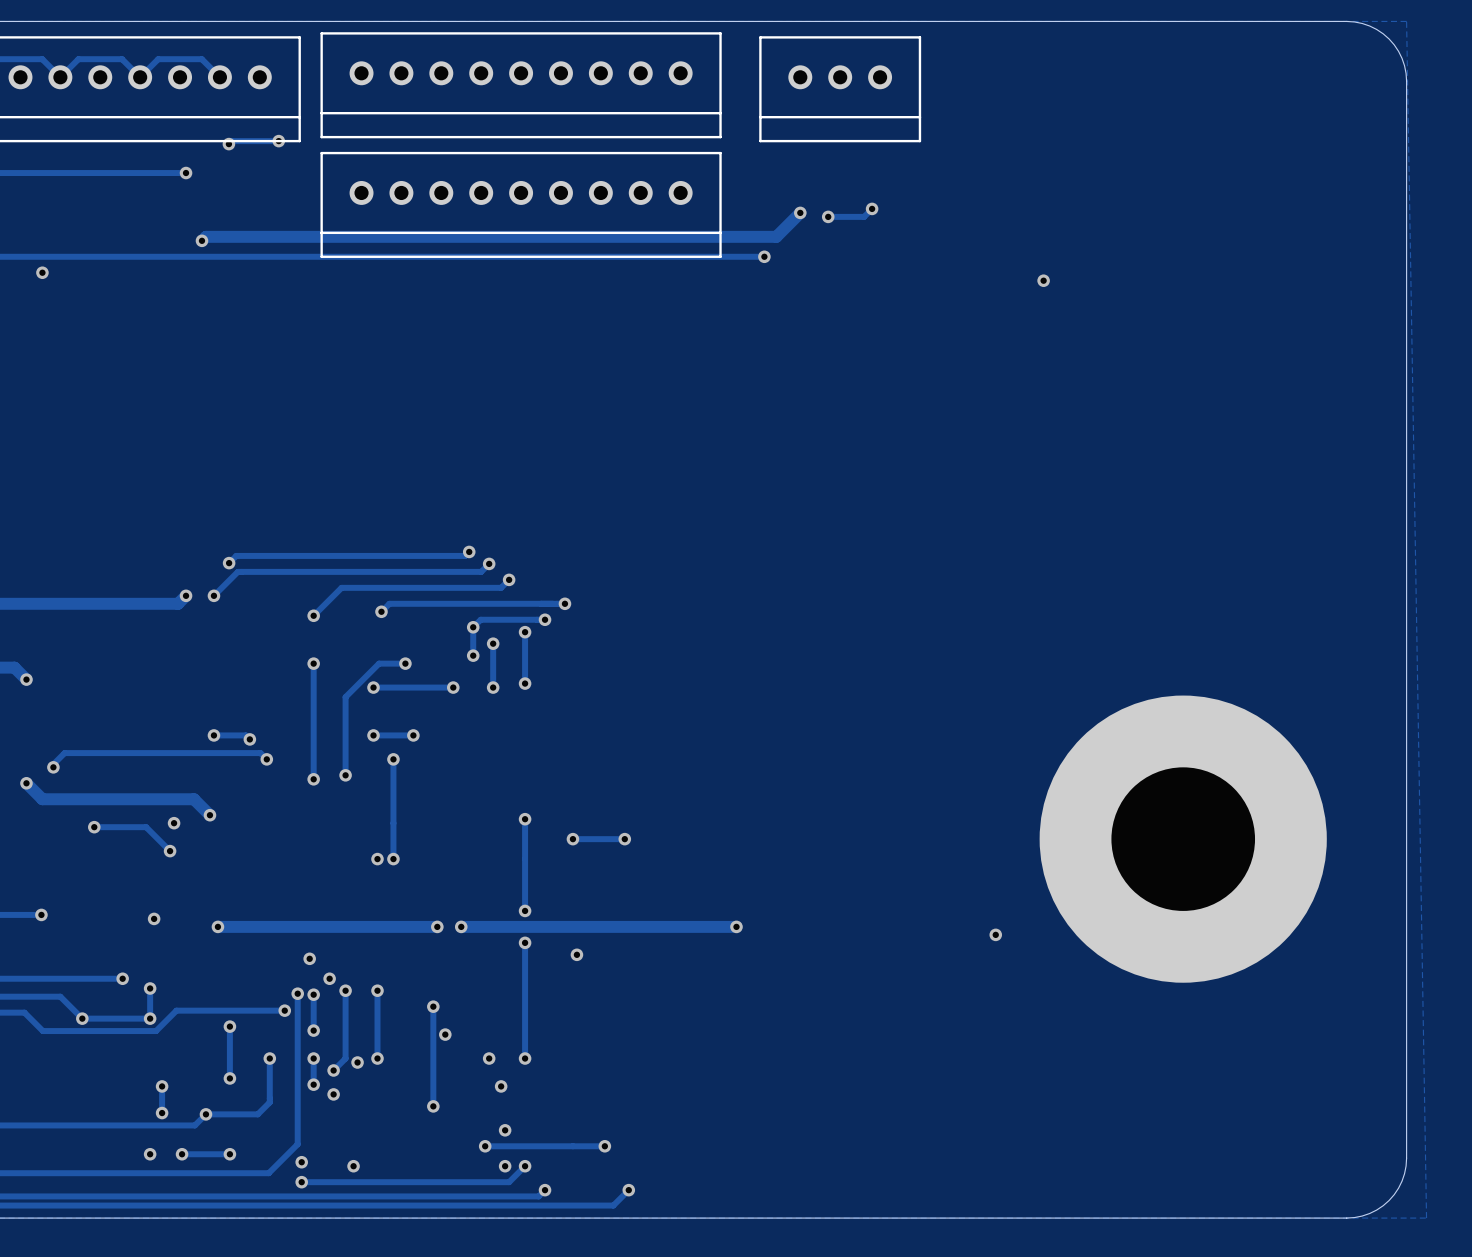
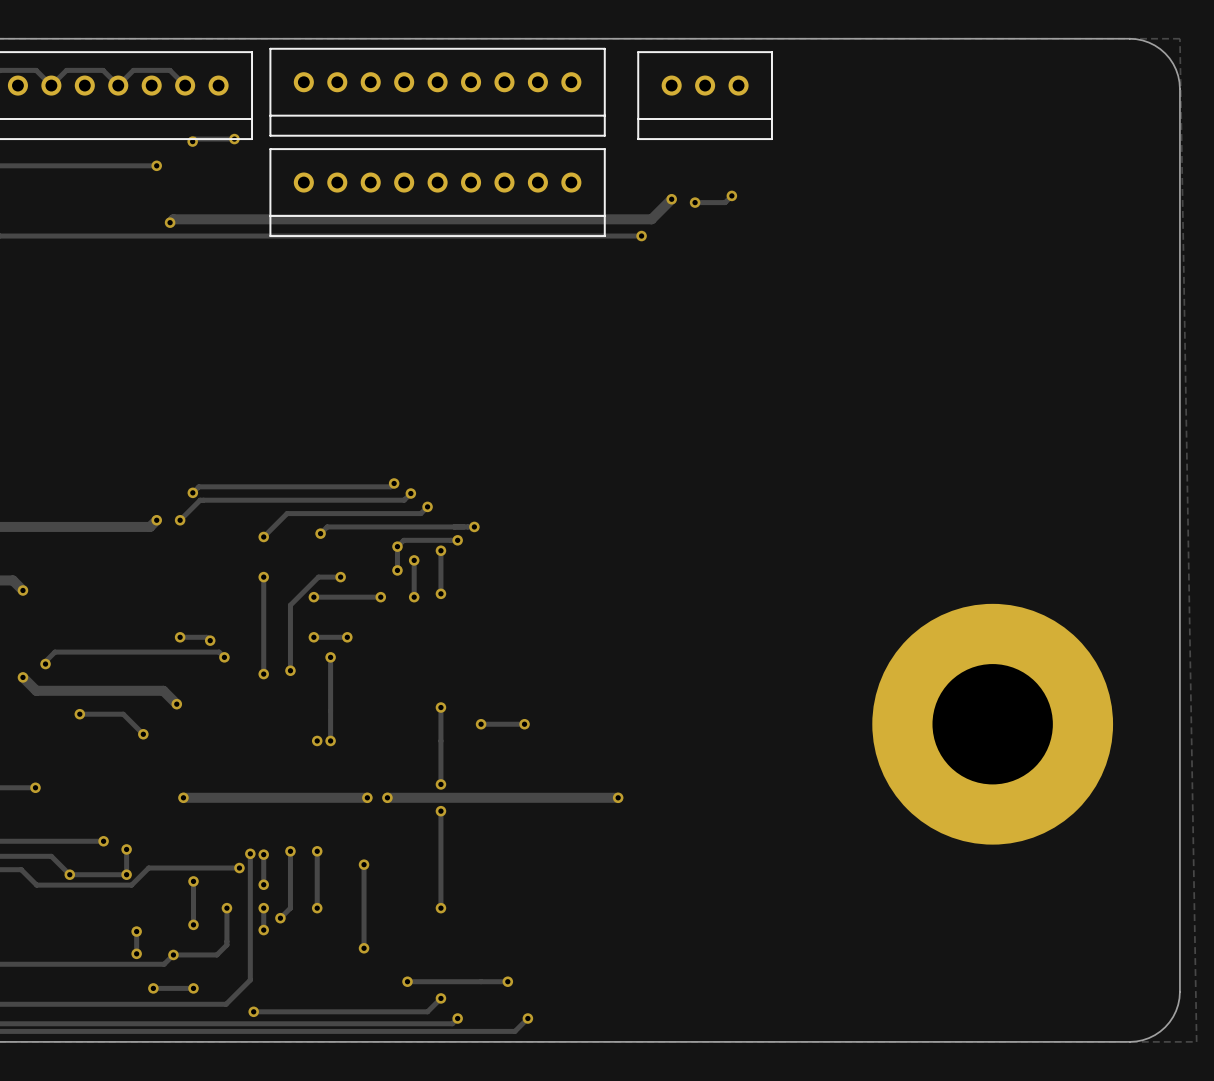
via: (42, 272) -> none
via: (1043, 280) -> none
via: (174, 823) -> none
via: (154, 918) -> none
via: (995, 934) -> none
via: (576, 954) -> none
via: (309, 958) -> none
via: (329, 978) -> none
via: (445, 1034) -> none
via: (489, 1058) -> none
via: (357, 1062) -> none
via: (501, 1086) -> none
via: (333, 1094) -> none
via: (505, 1130) -> none
via: (150, 1154) -> none
via: (301, 1162) -> none
via: (353, 1166) -> none
via: (505, 1166) -> none

